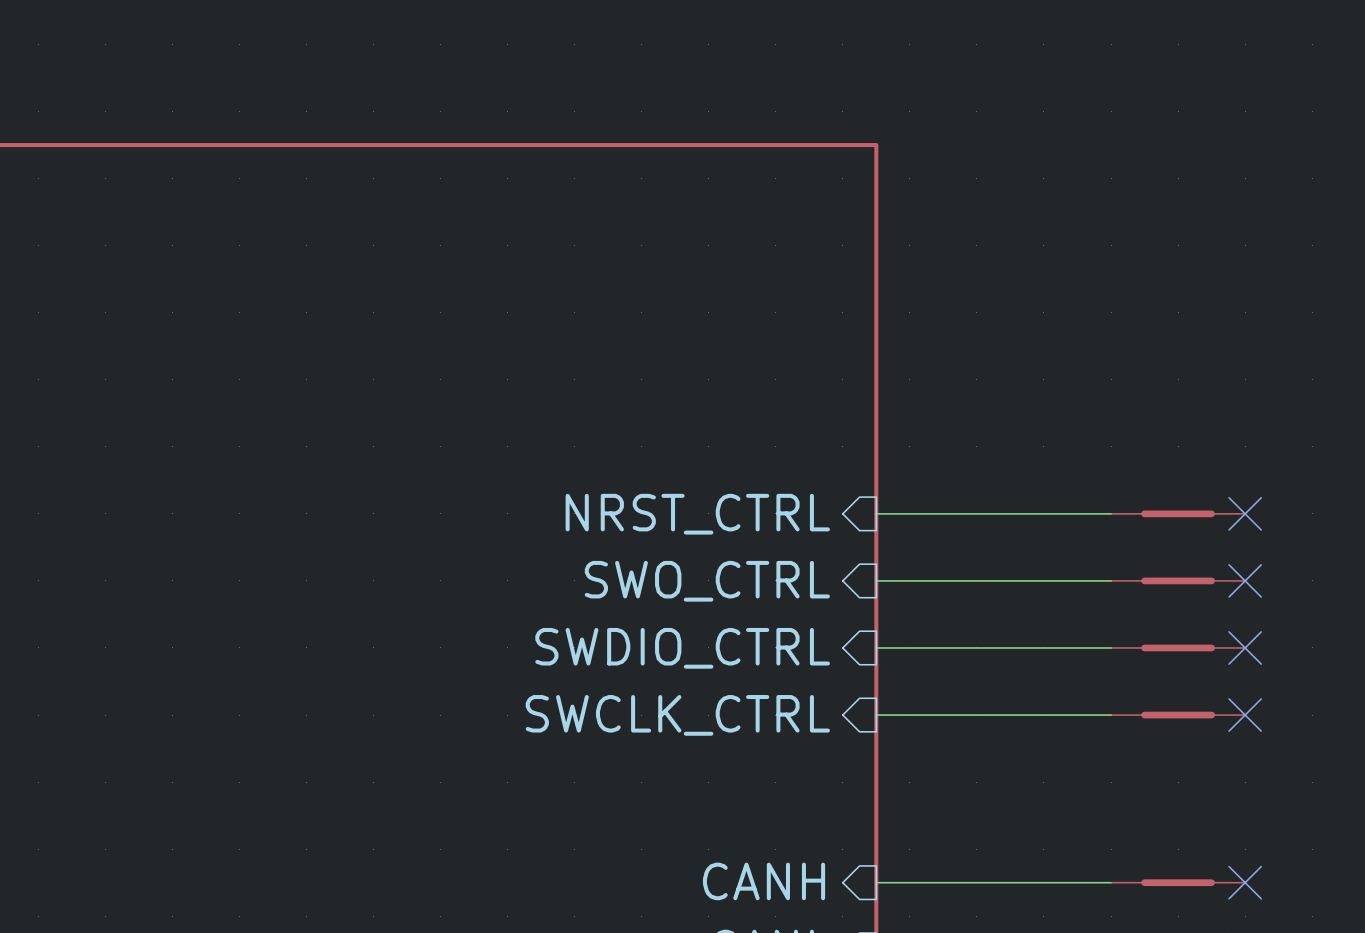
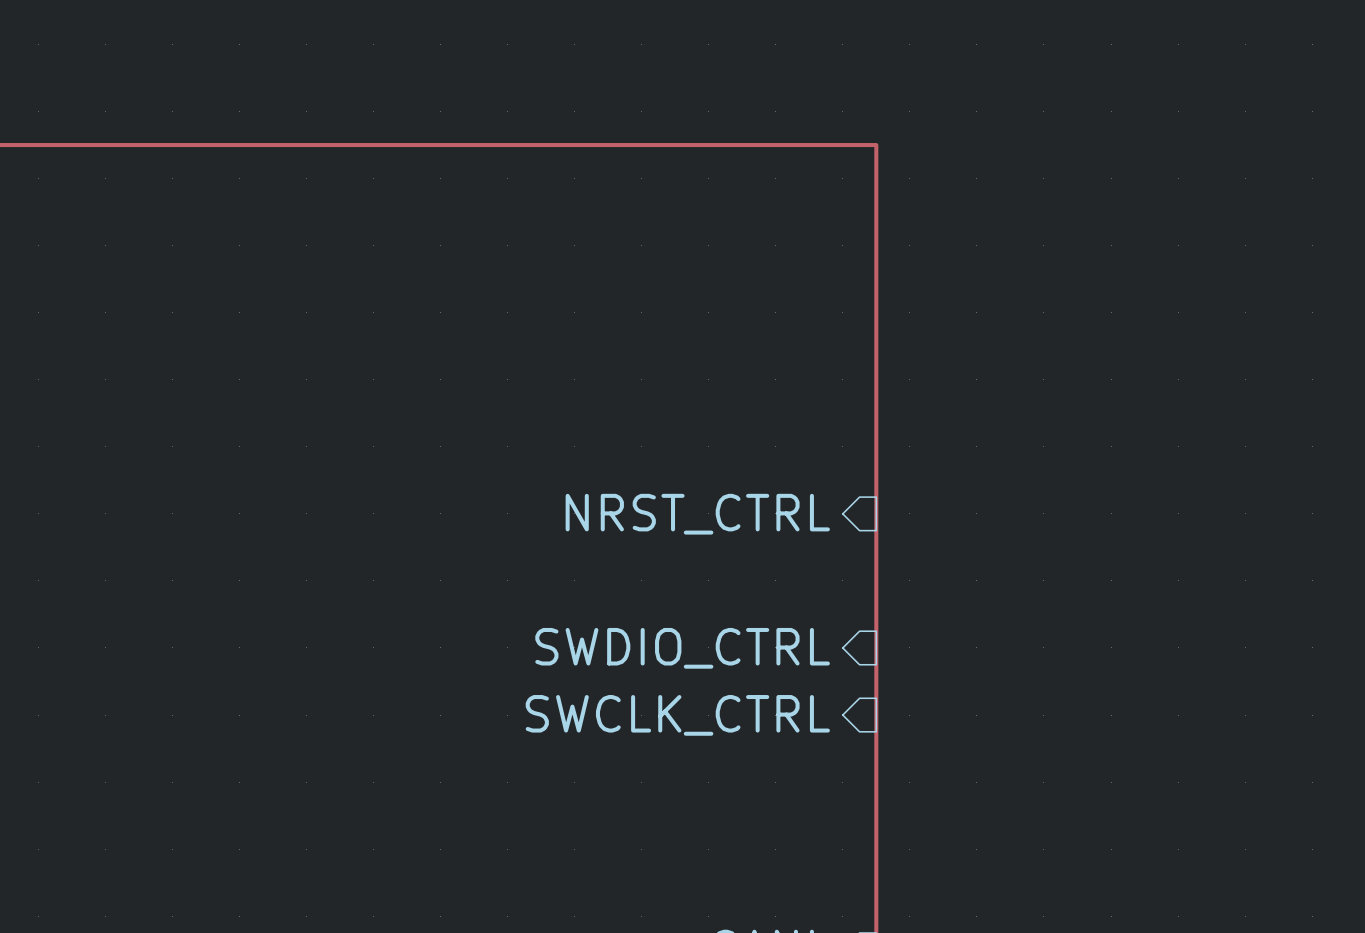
wire: (876, 513) (1111, 513) -> none
part: (1178, 513) -> none
no-connect mark: (1245, 513) -> none
wire: (876, 580) (1111, 580) -> none
part: (1178, 580) -> none
no-connect mark: (1245, 580) -> none
sheet pin: SWO_CTRL (707, 581) -> none
wire: (876, 647) (1111, 647) -> none
part: (1178, 647) -> none
no-connect mark: (1245, 647) -> none
wire: (876, 715) (1111, 715) -> none
part: (1178, 715) -> none
no-connect mark: (1245, 715) -> none
sheet pin: CANH (764, 881) -> none
wire: (876, 882) (1111, 882) -> none
part: (1178, 882) -> none
no-connect mark: (1245, 882) -> none

